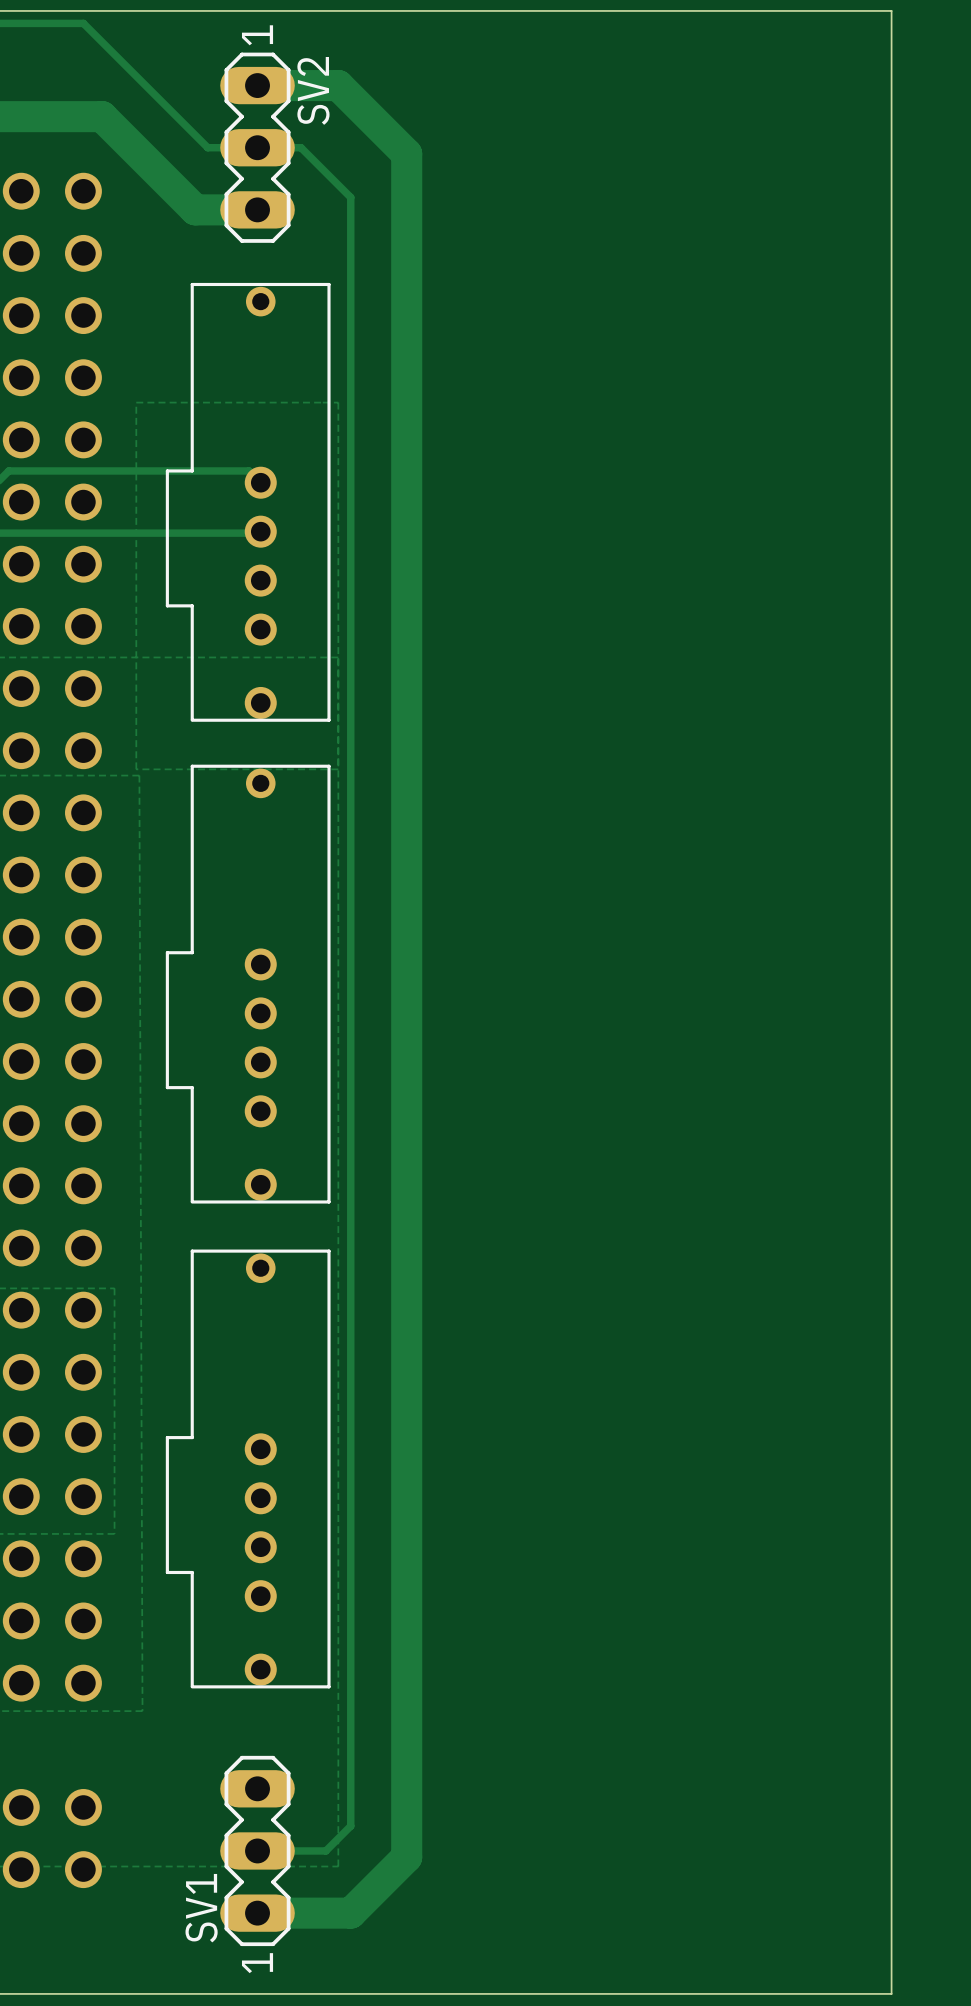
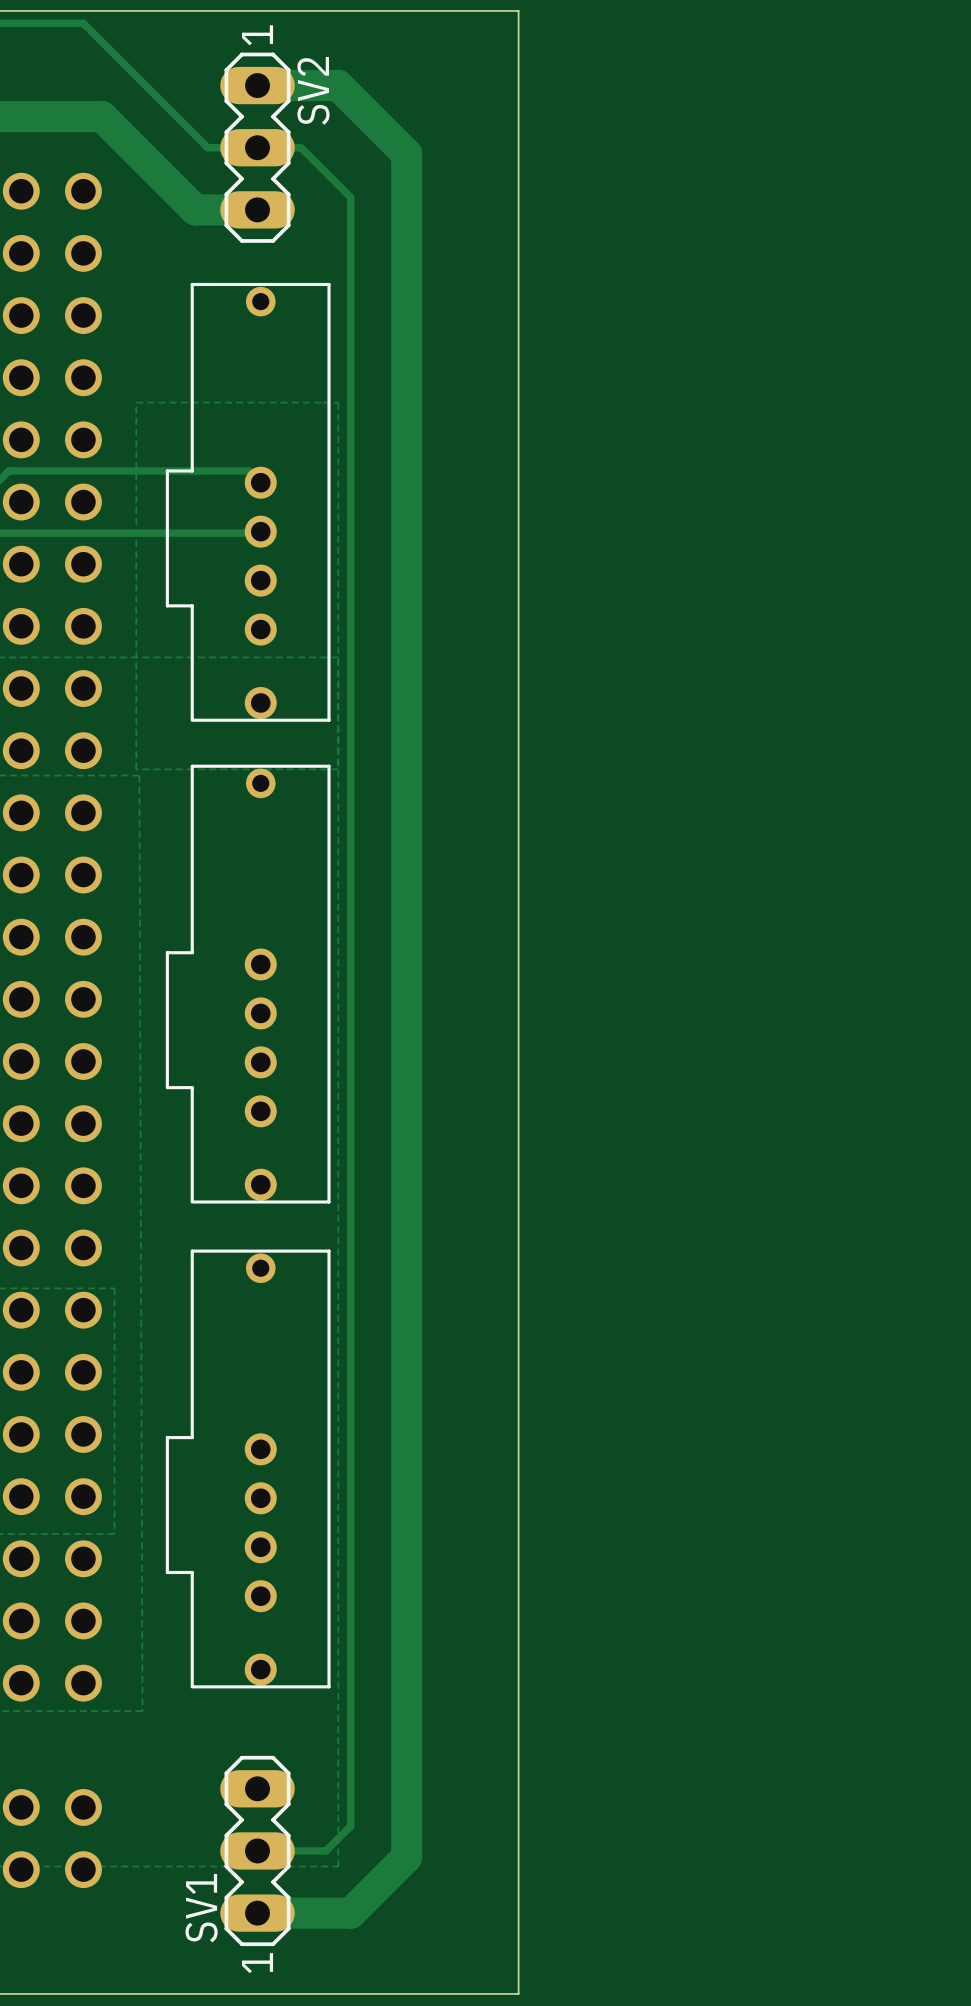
board edge: (518, 10) (891, 10) (891, 1993) (518, 1993) -> (518, 10) (518, 1993)

